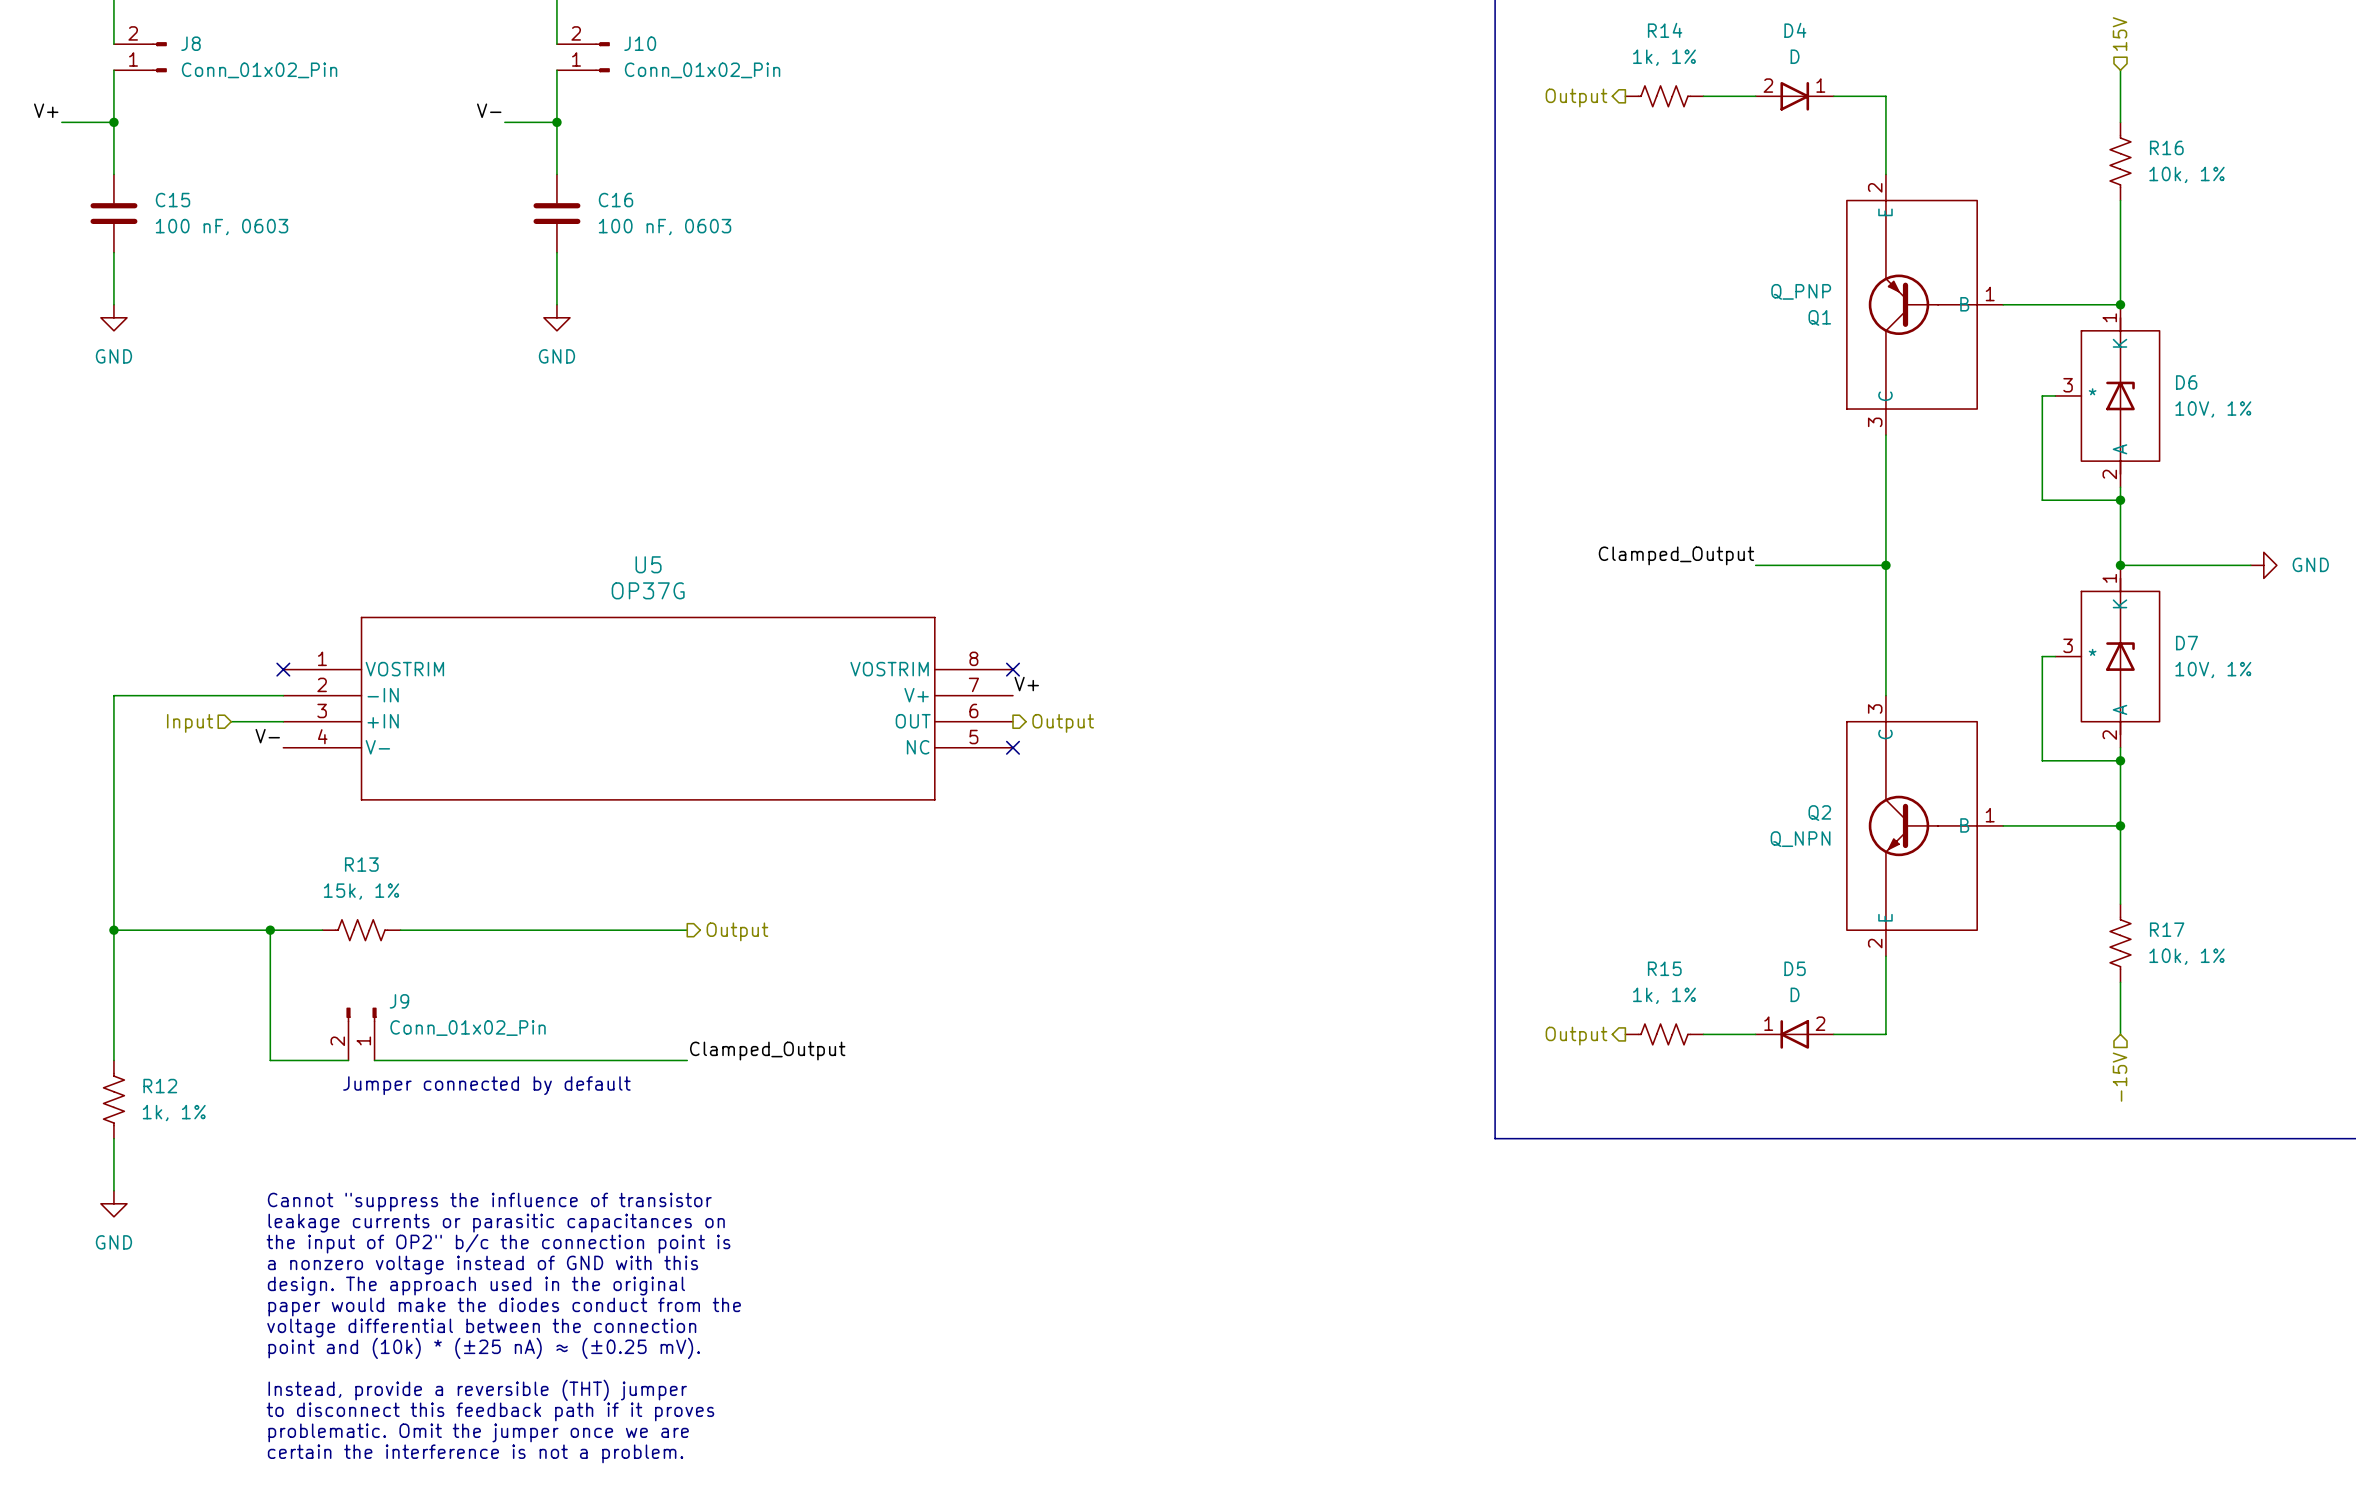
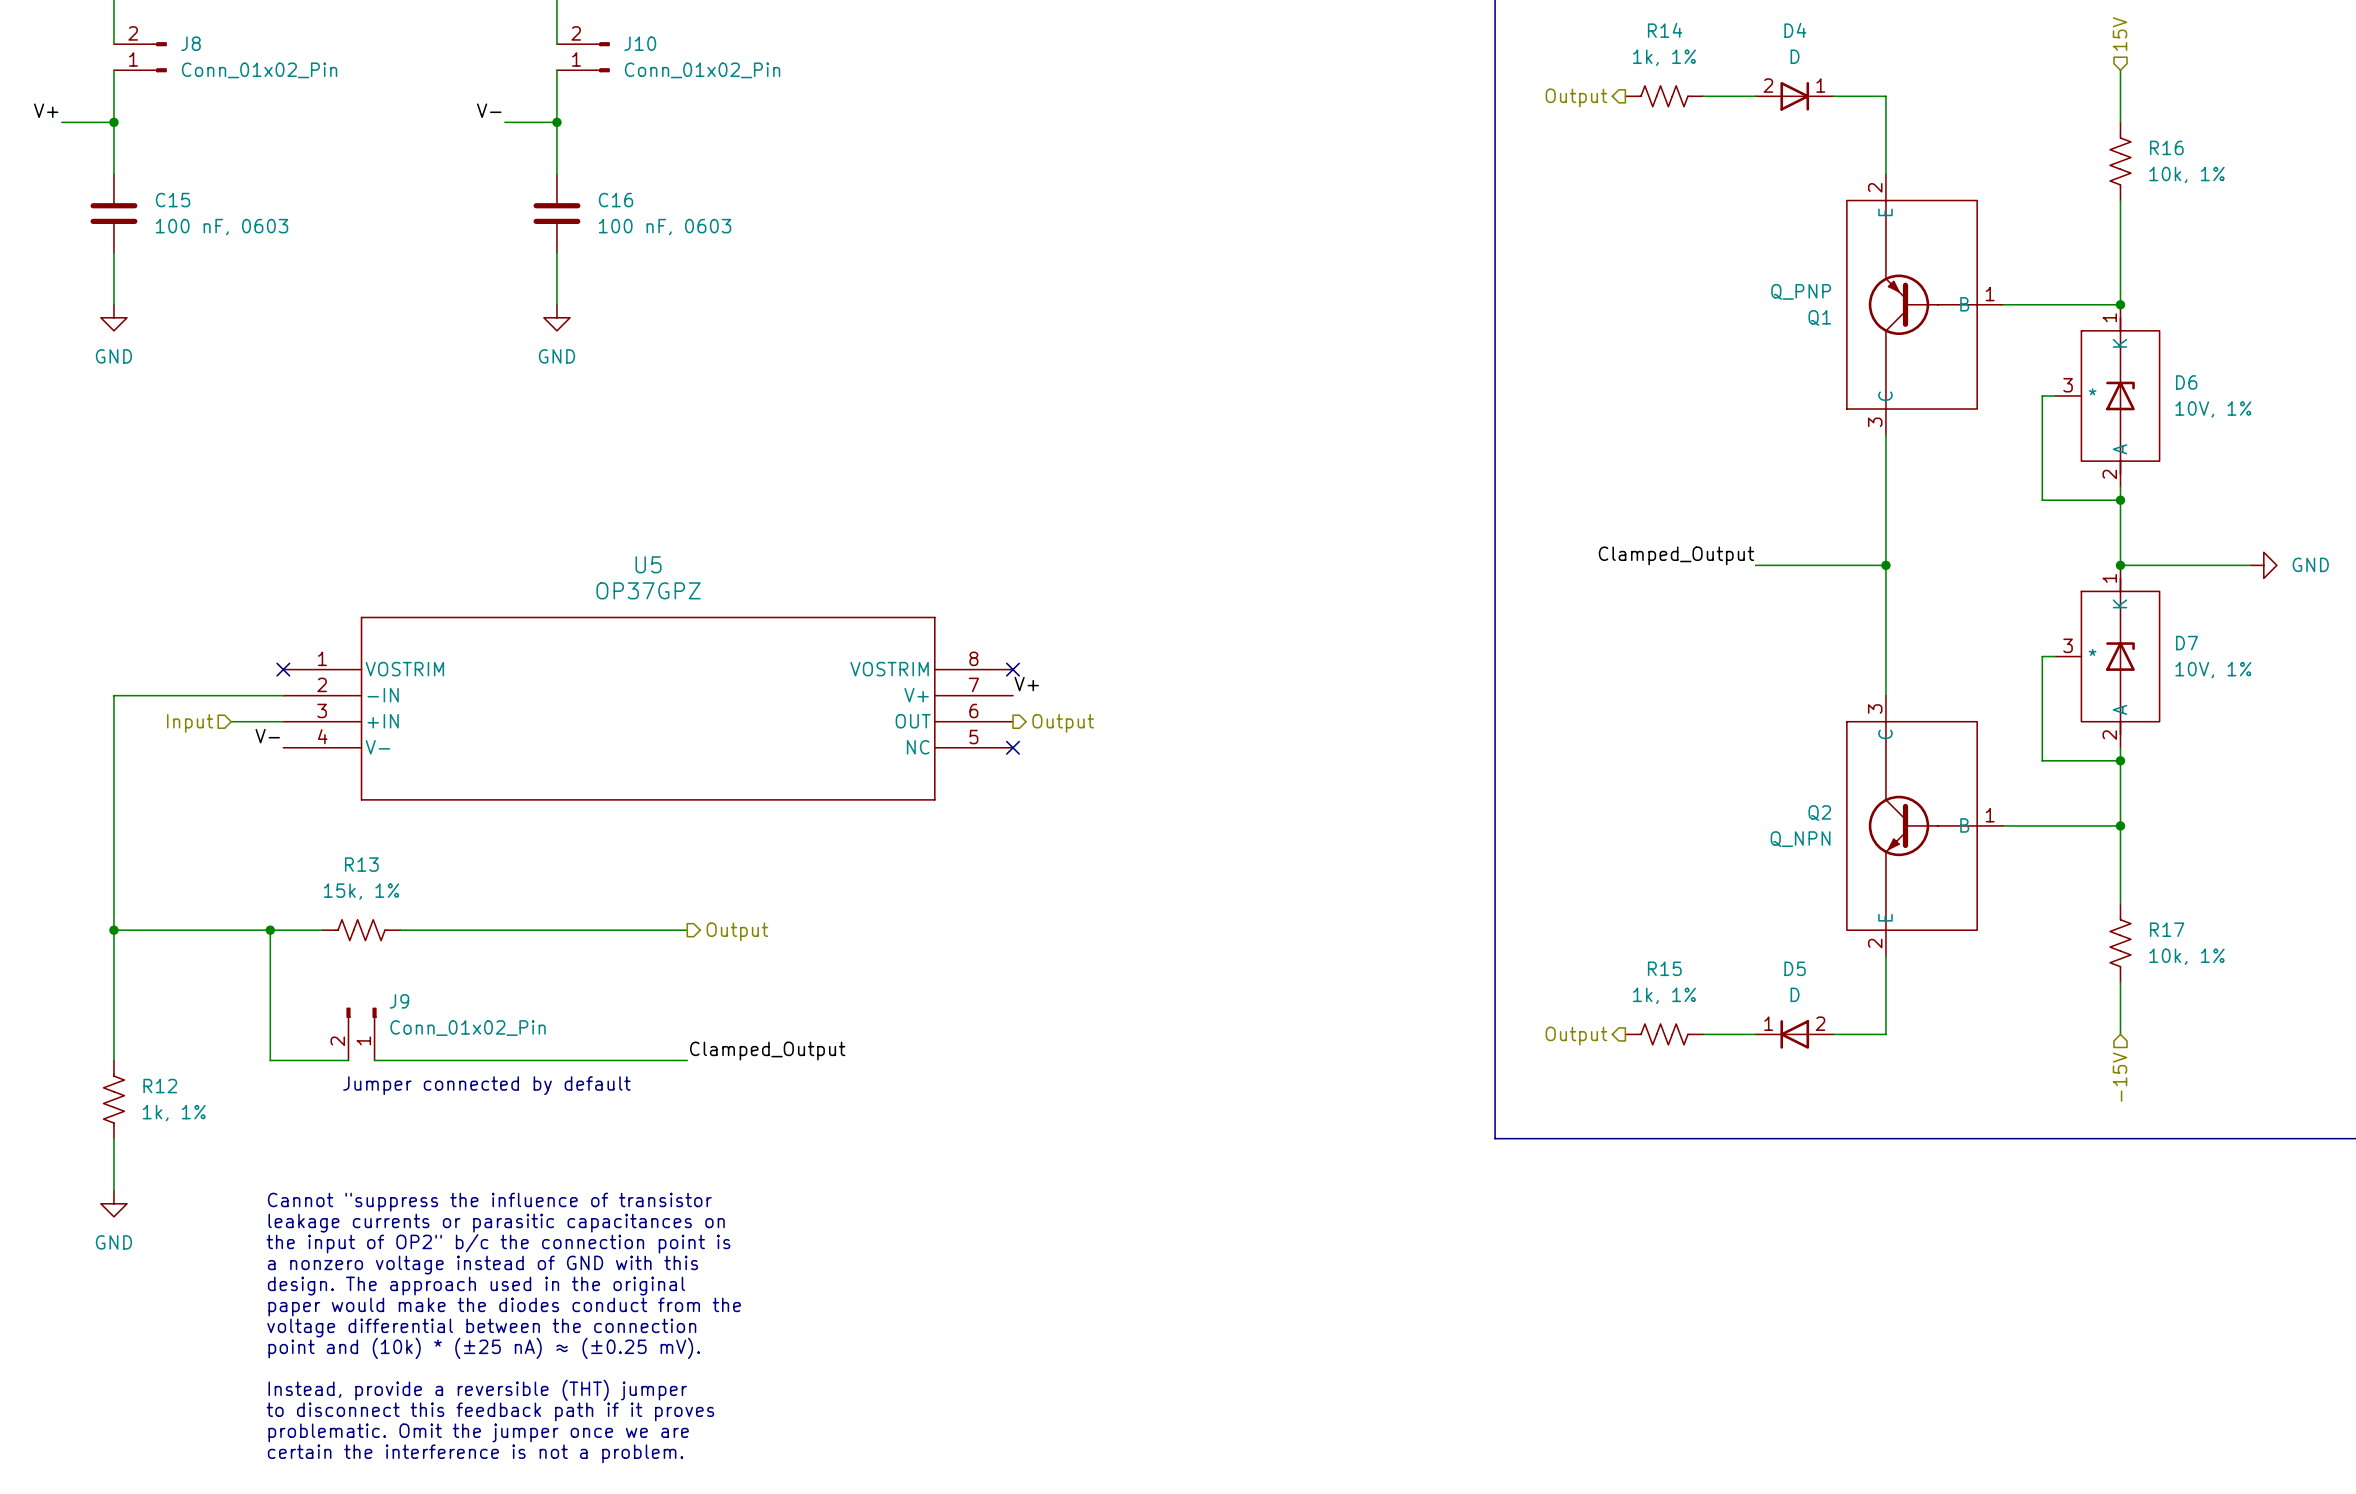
U5 value: OP37G (648, 590) -> OP37GPZ (648, 590)

